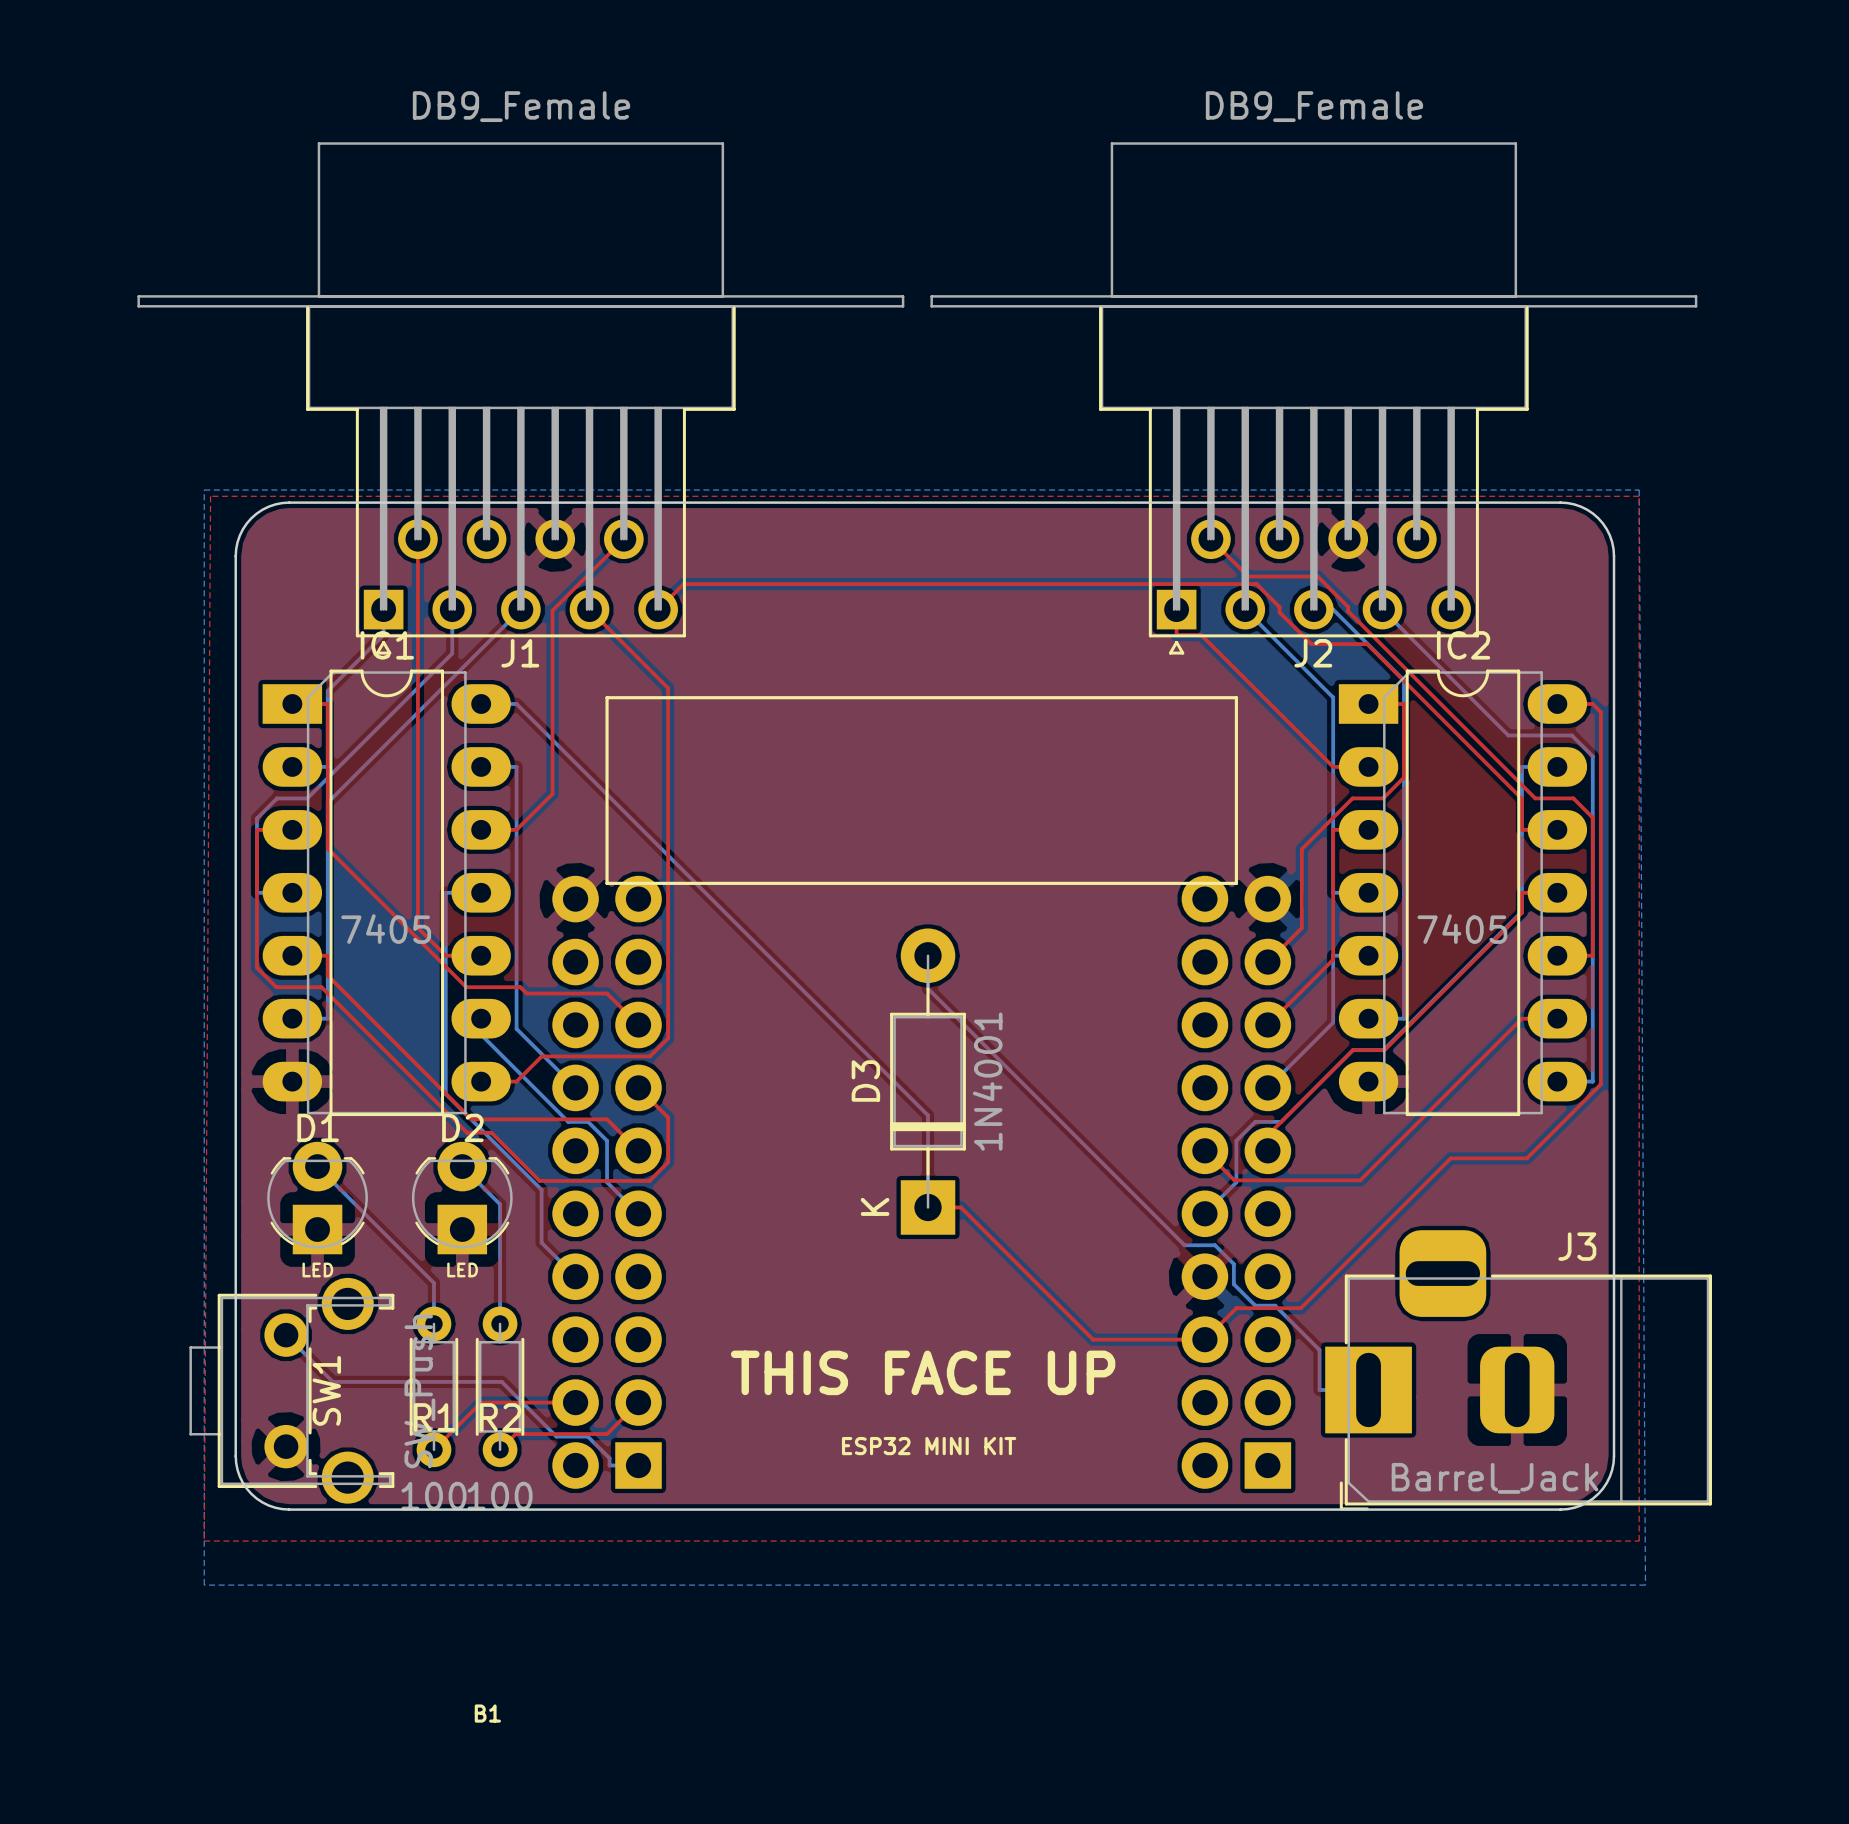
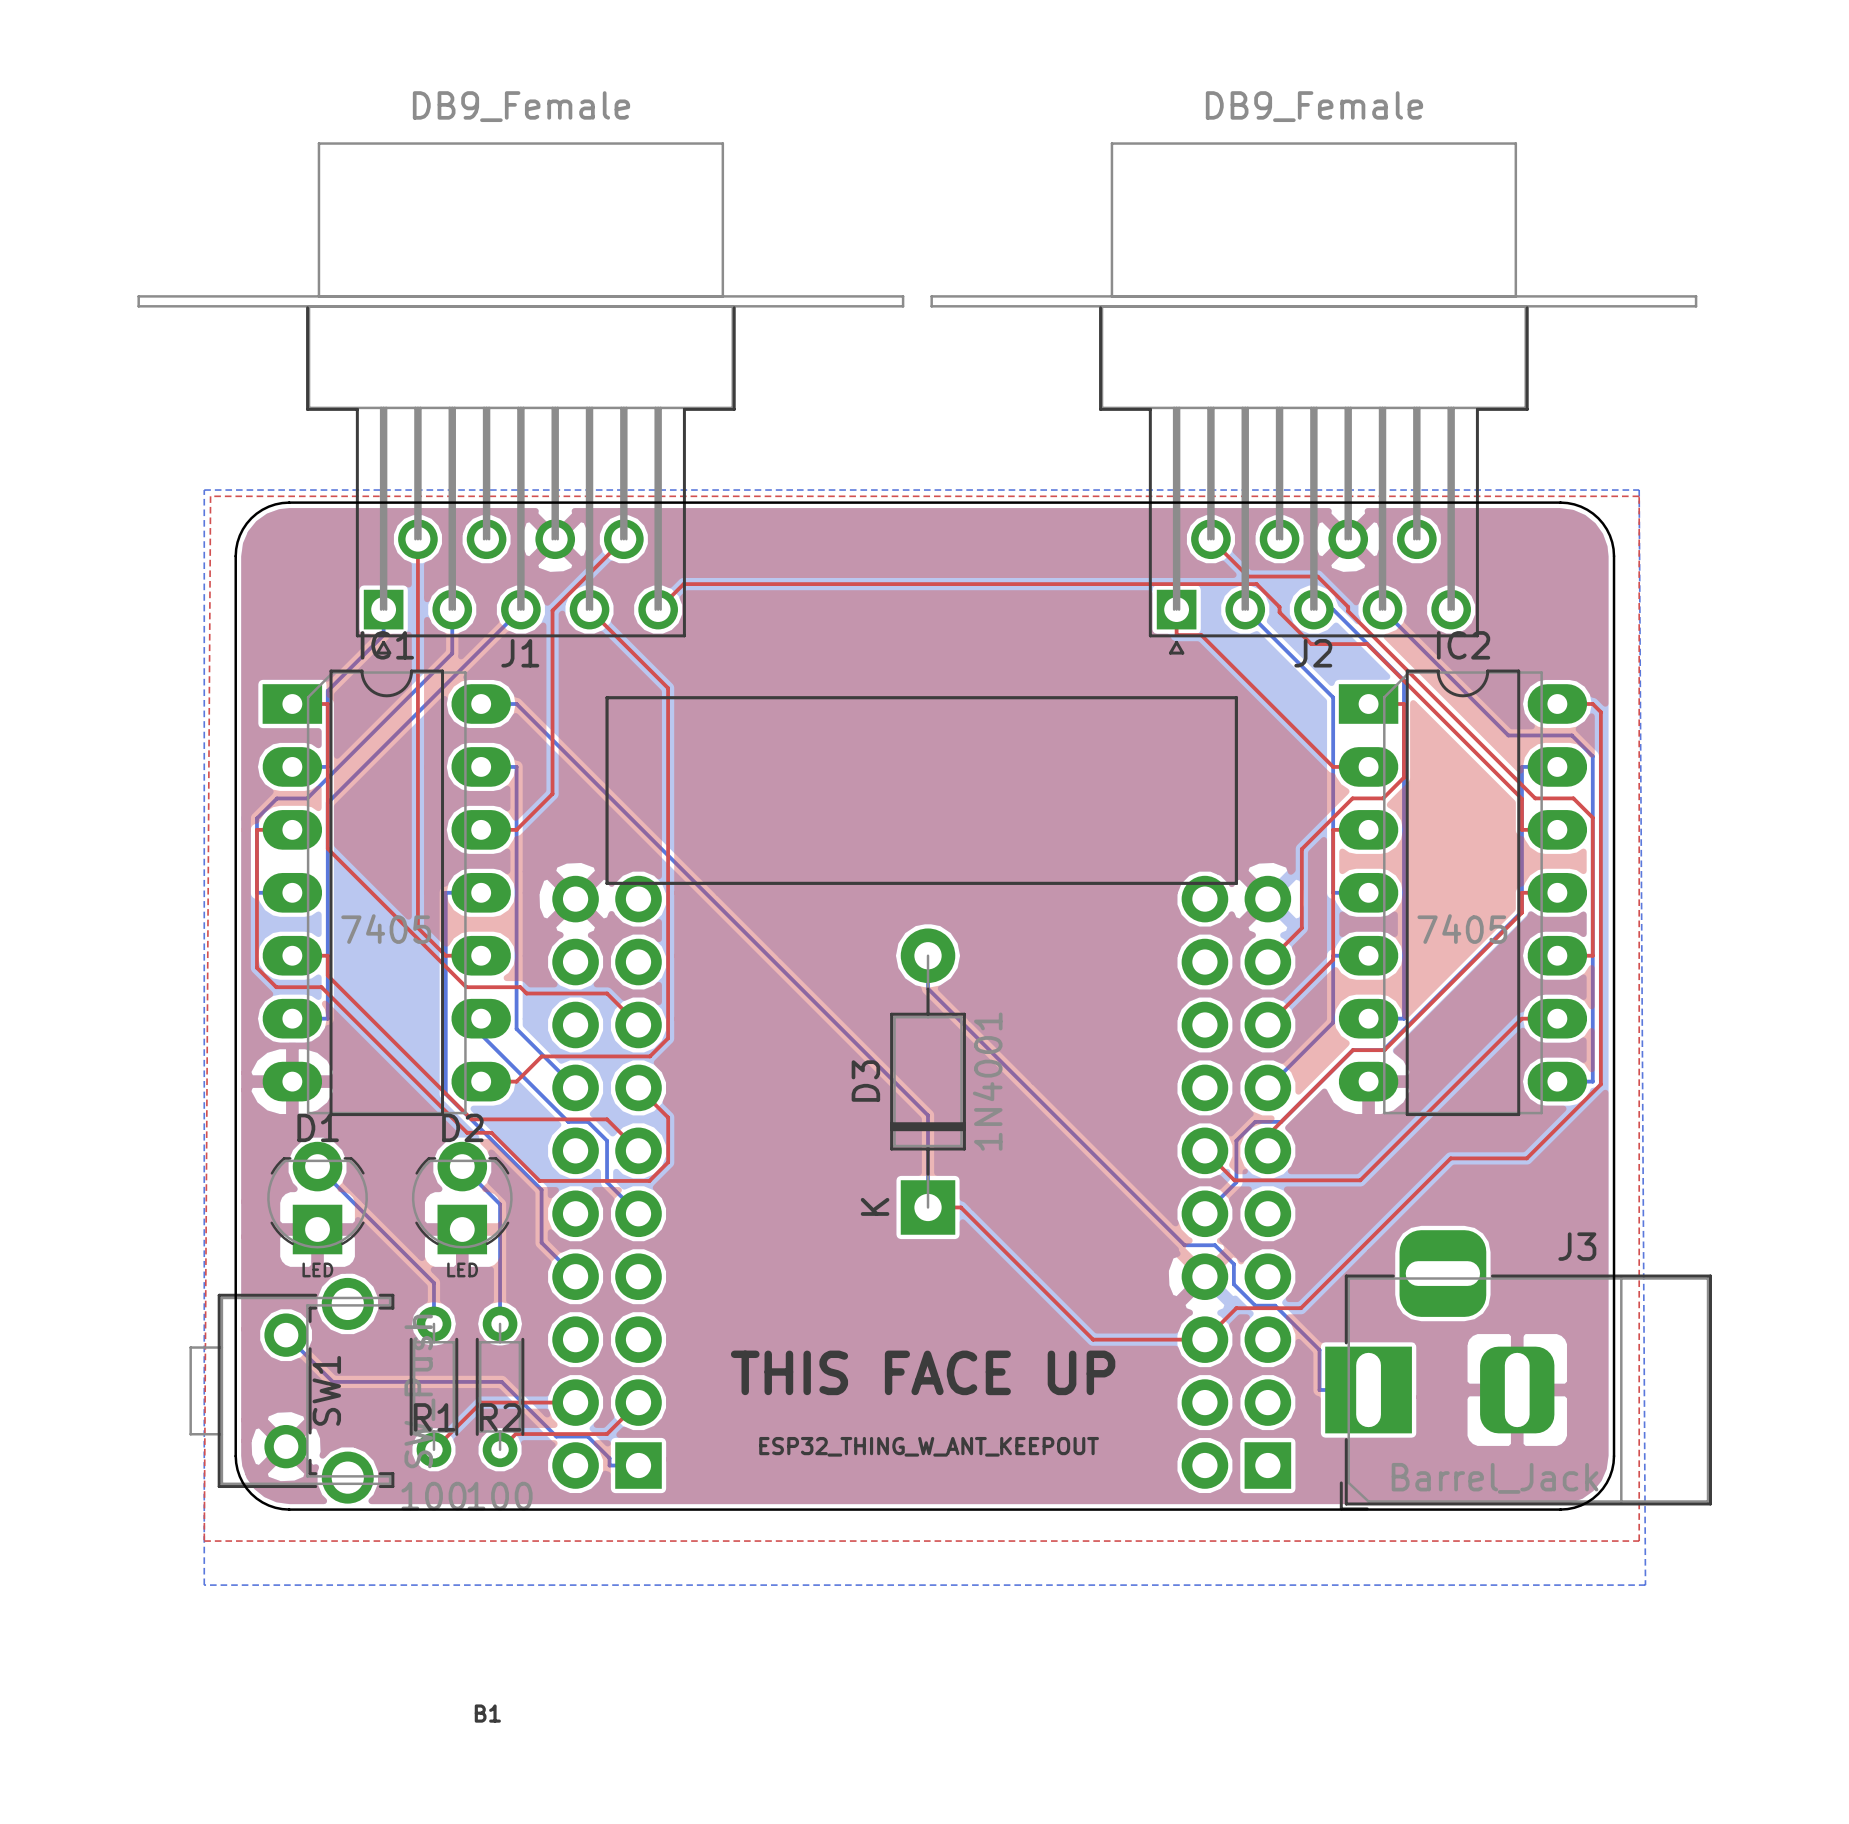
B1 value: ESP32 MINI KIT (929, 1446) -> ESP32_THING_W_ANT_KEEPOUT (929, 1446)

